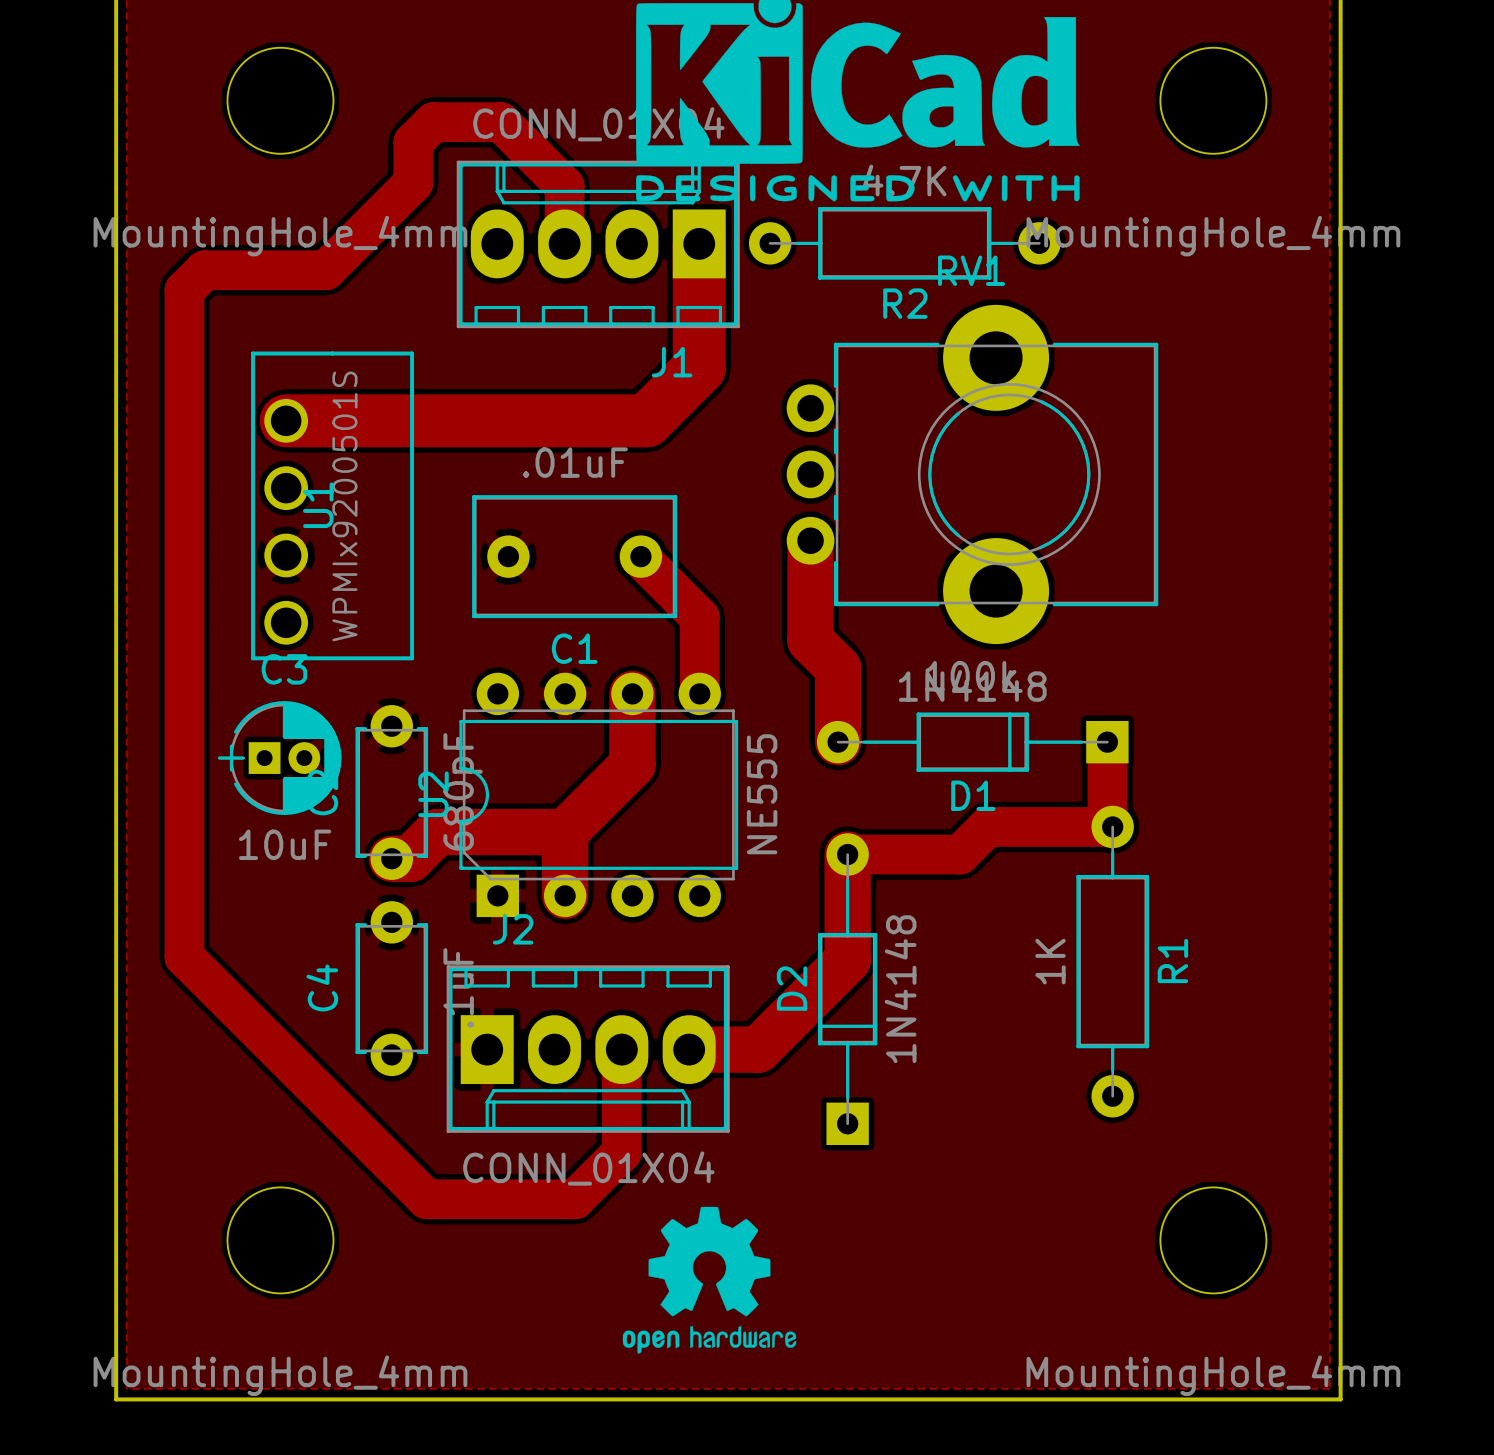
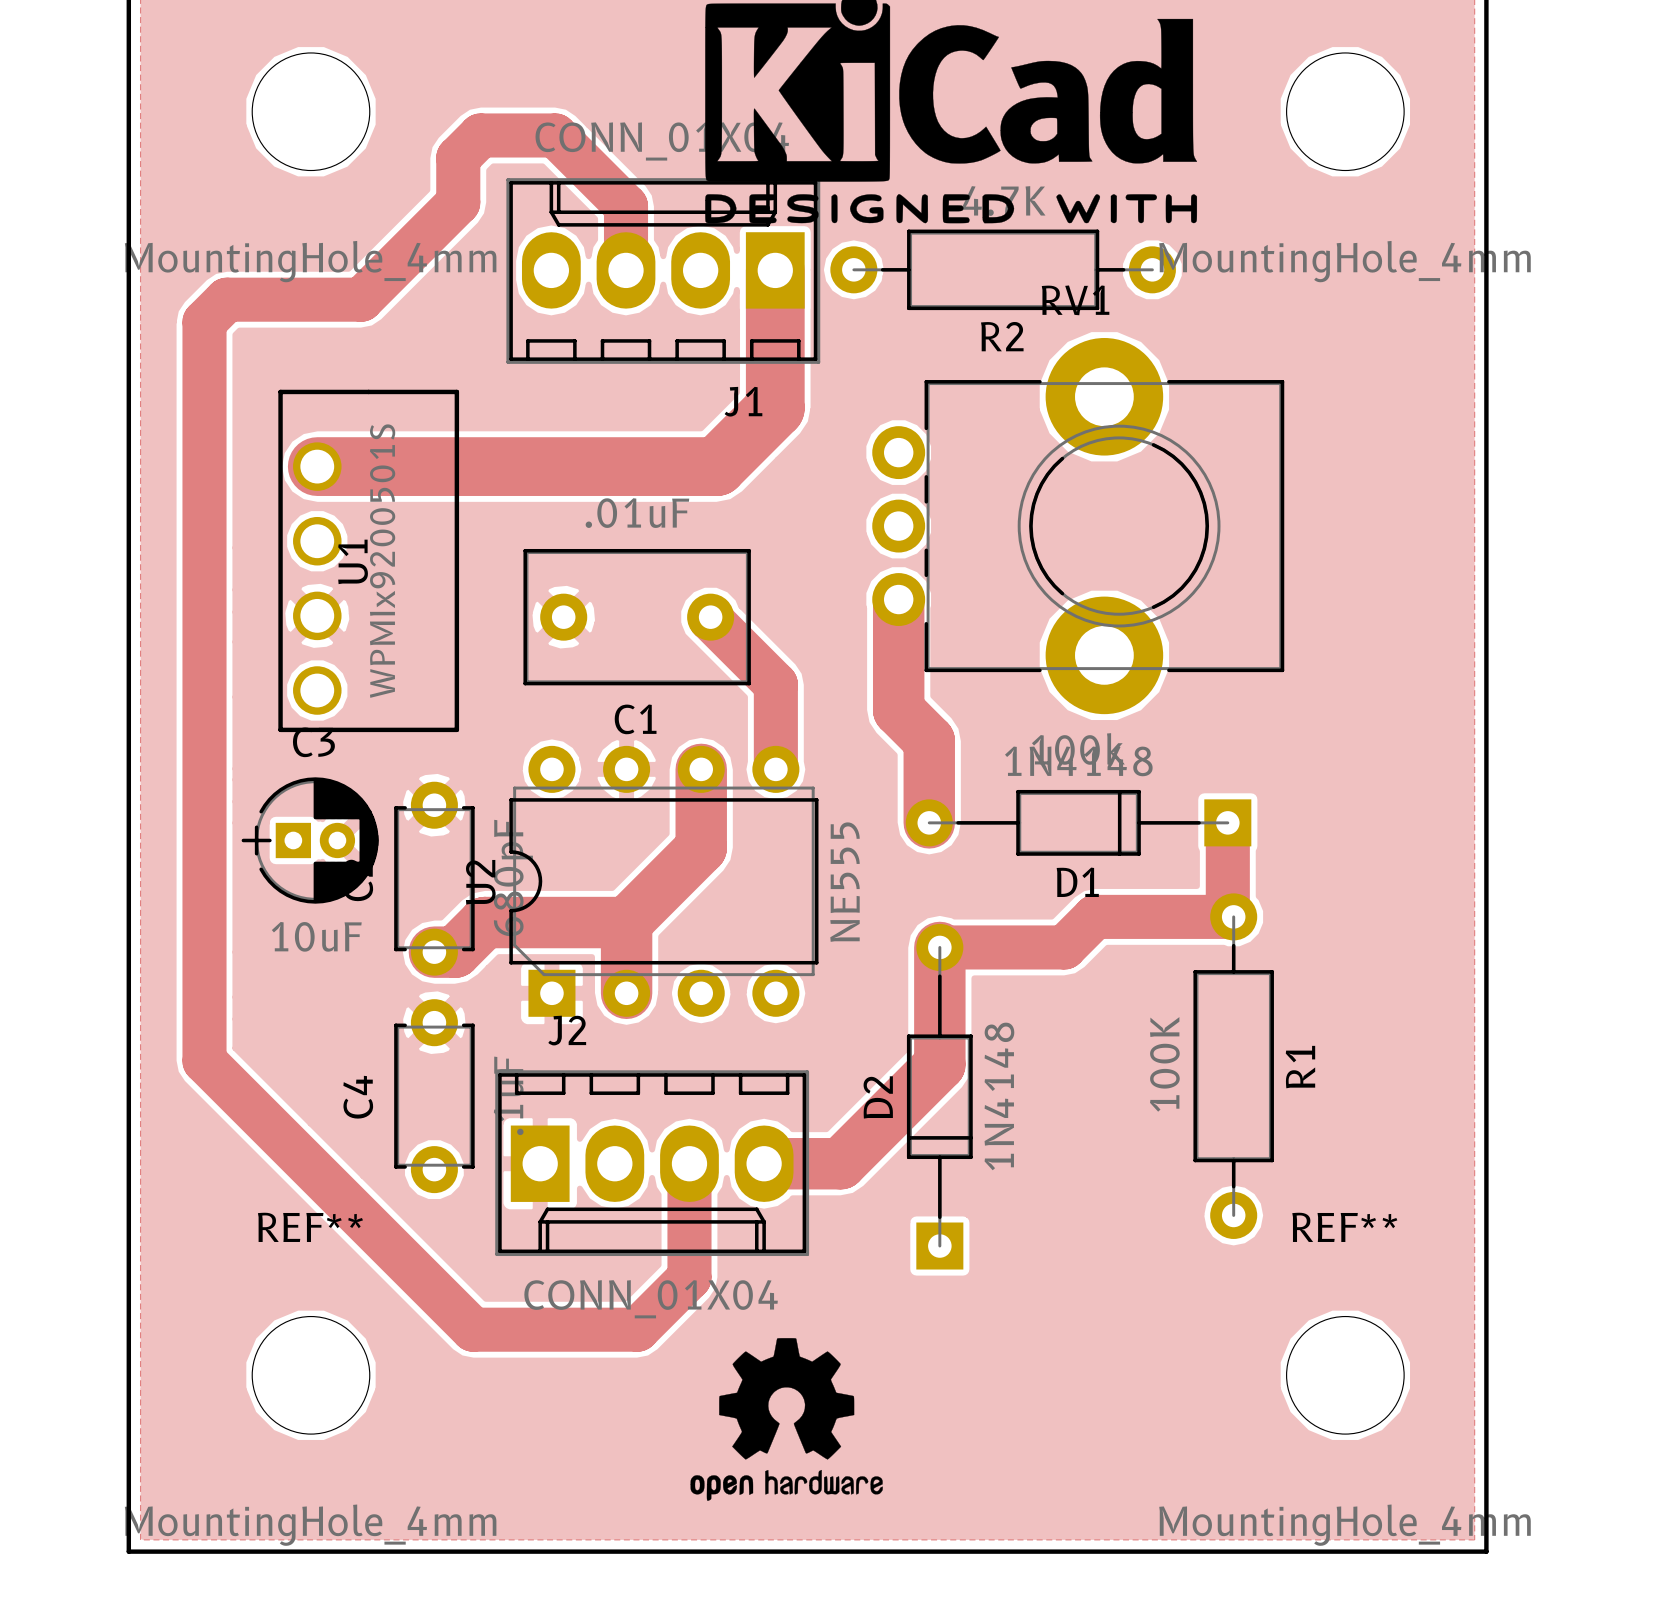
R1 value: 1K (1050, 961) -> 100K (1164, 1064)
REF** name: none -> REF** (310, 1227)
REF** name: none -> REF** (1344, 1227)

